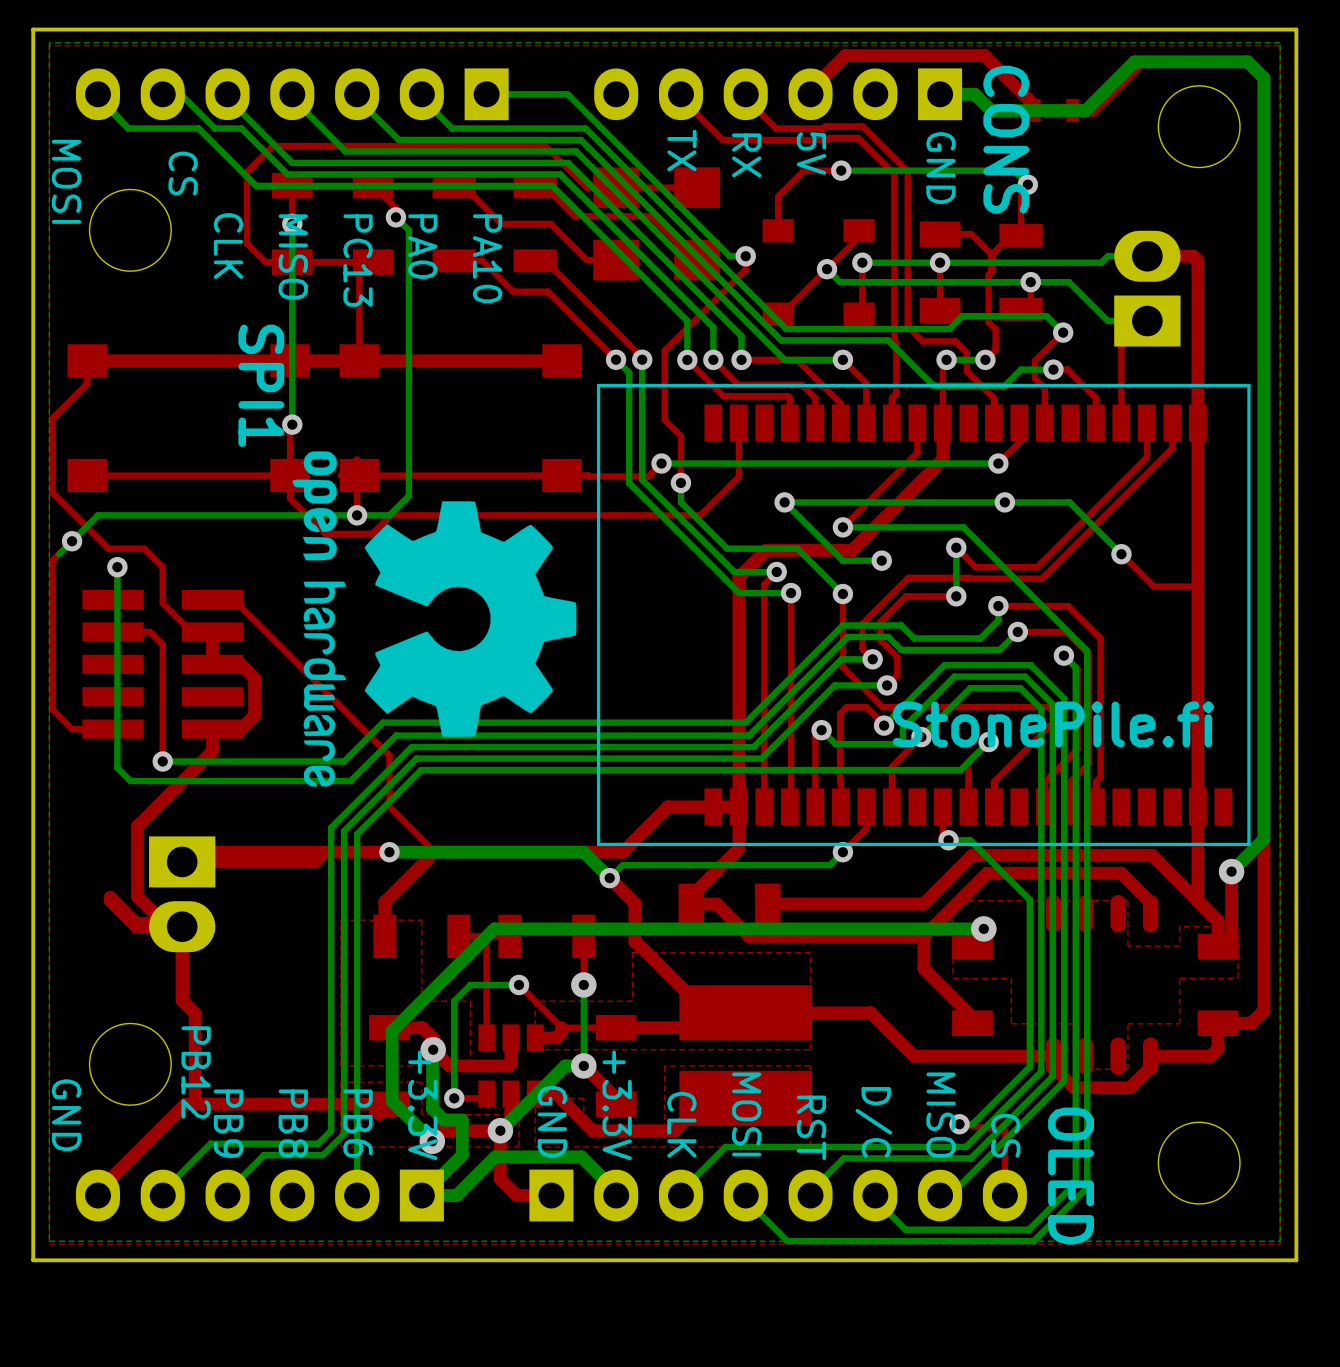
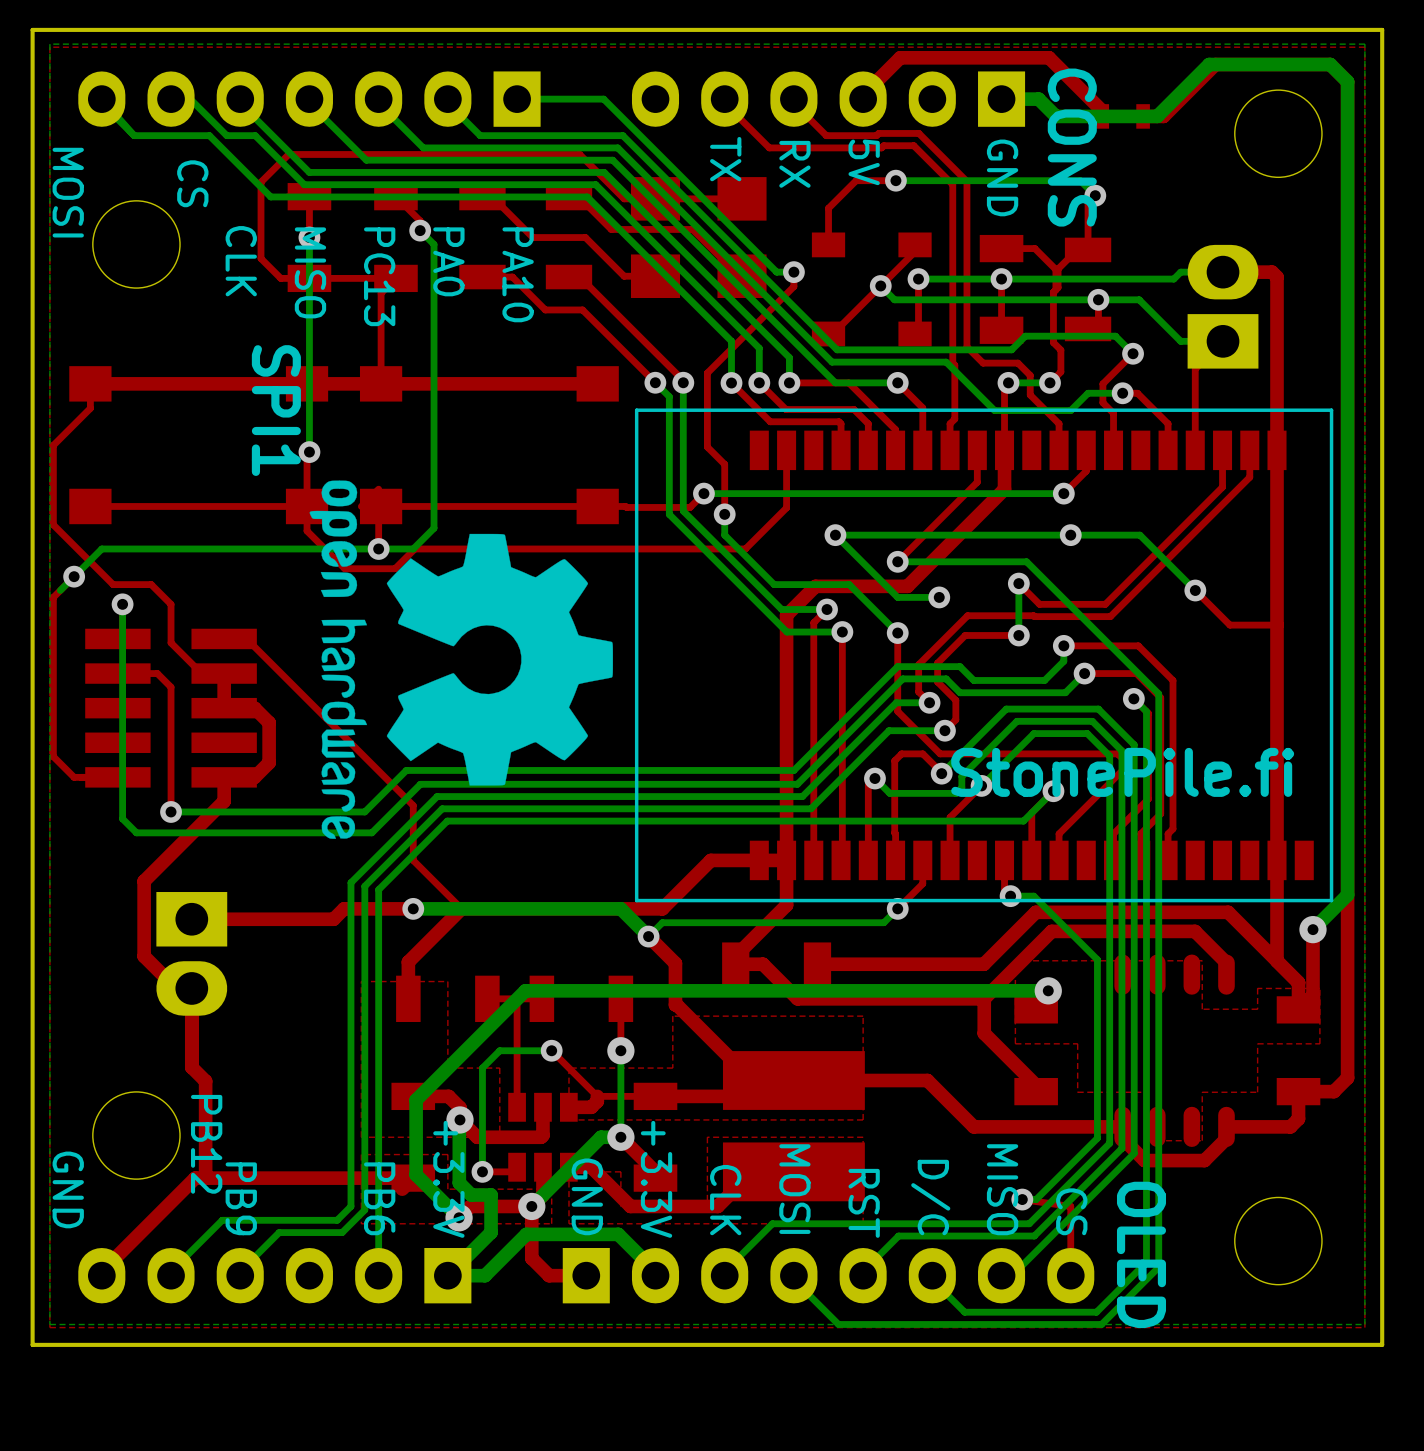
top track: (324, 852) (188, 852) -> none
top track: (182, 923) (136, 923) (110, 897) (110, 900) (136, 926) (167, 926) -> none
text: PB8 (293, 1123) -> none

